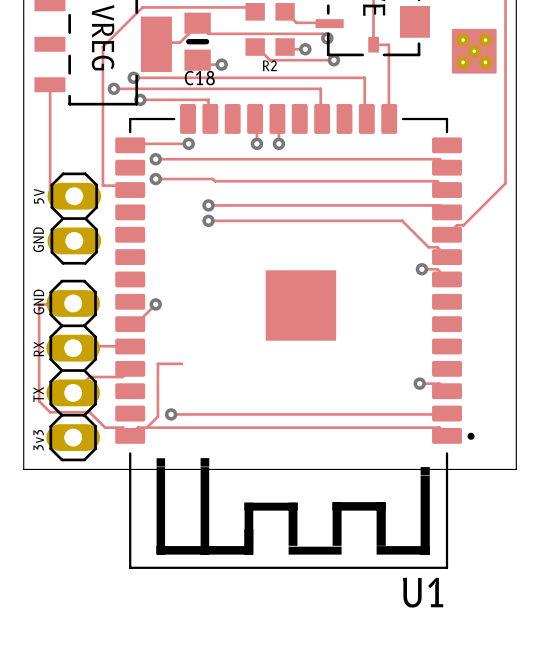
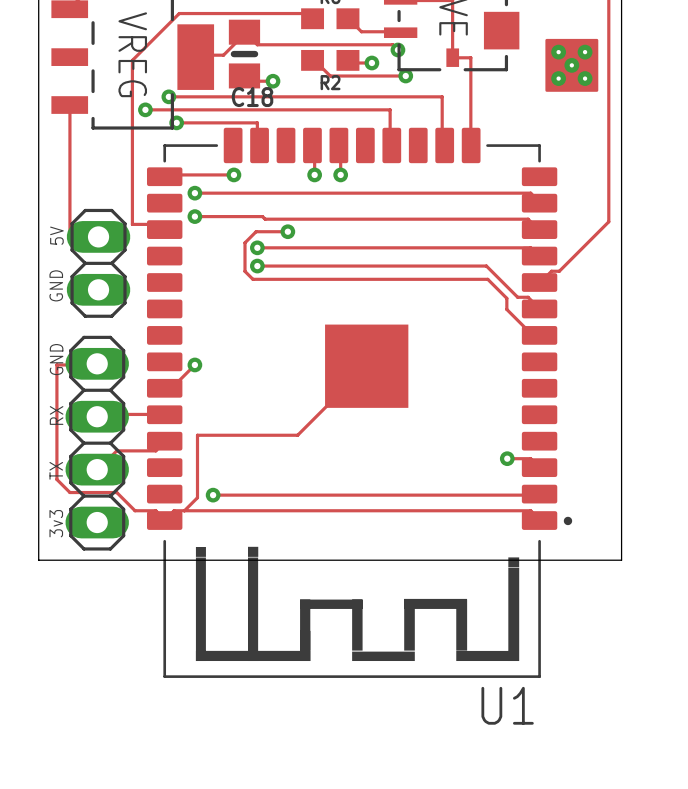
via: none -> (287, 231)
track: (421, 269) (437, 269) (447, 279) -> (287, 231) (256, 231) (245, 242) (245, 271) (252, 279) (487, 279) (506, 298) (506, 309) (532, 334) (539, 335)
via: (421, 269) -> none
track: none -> (366, 366) (297, 435) (226, 435)

